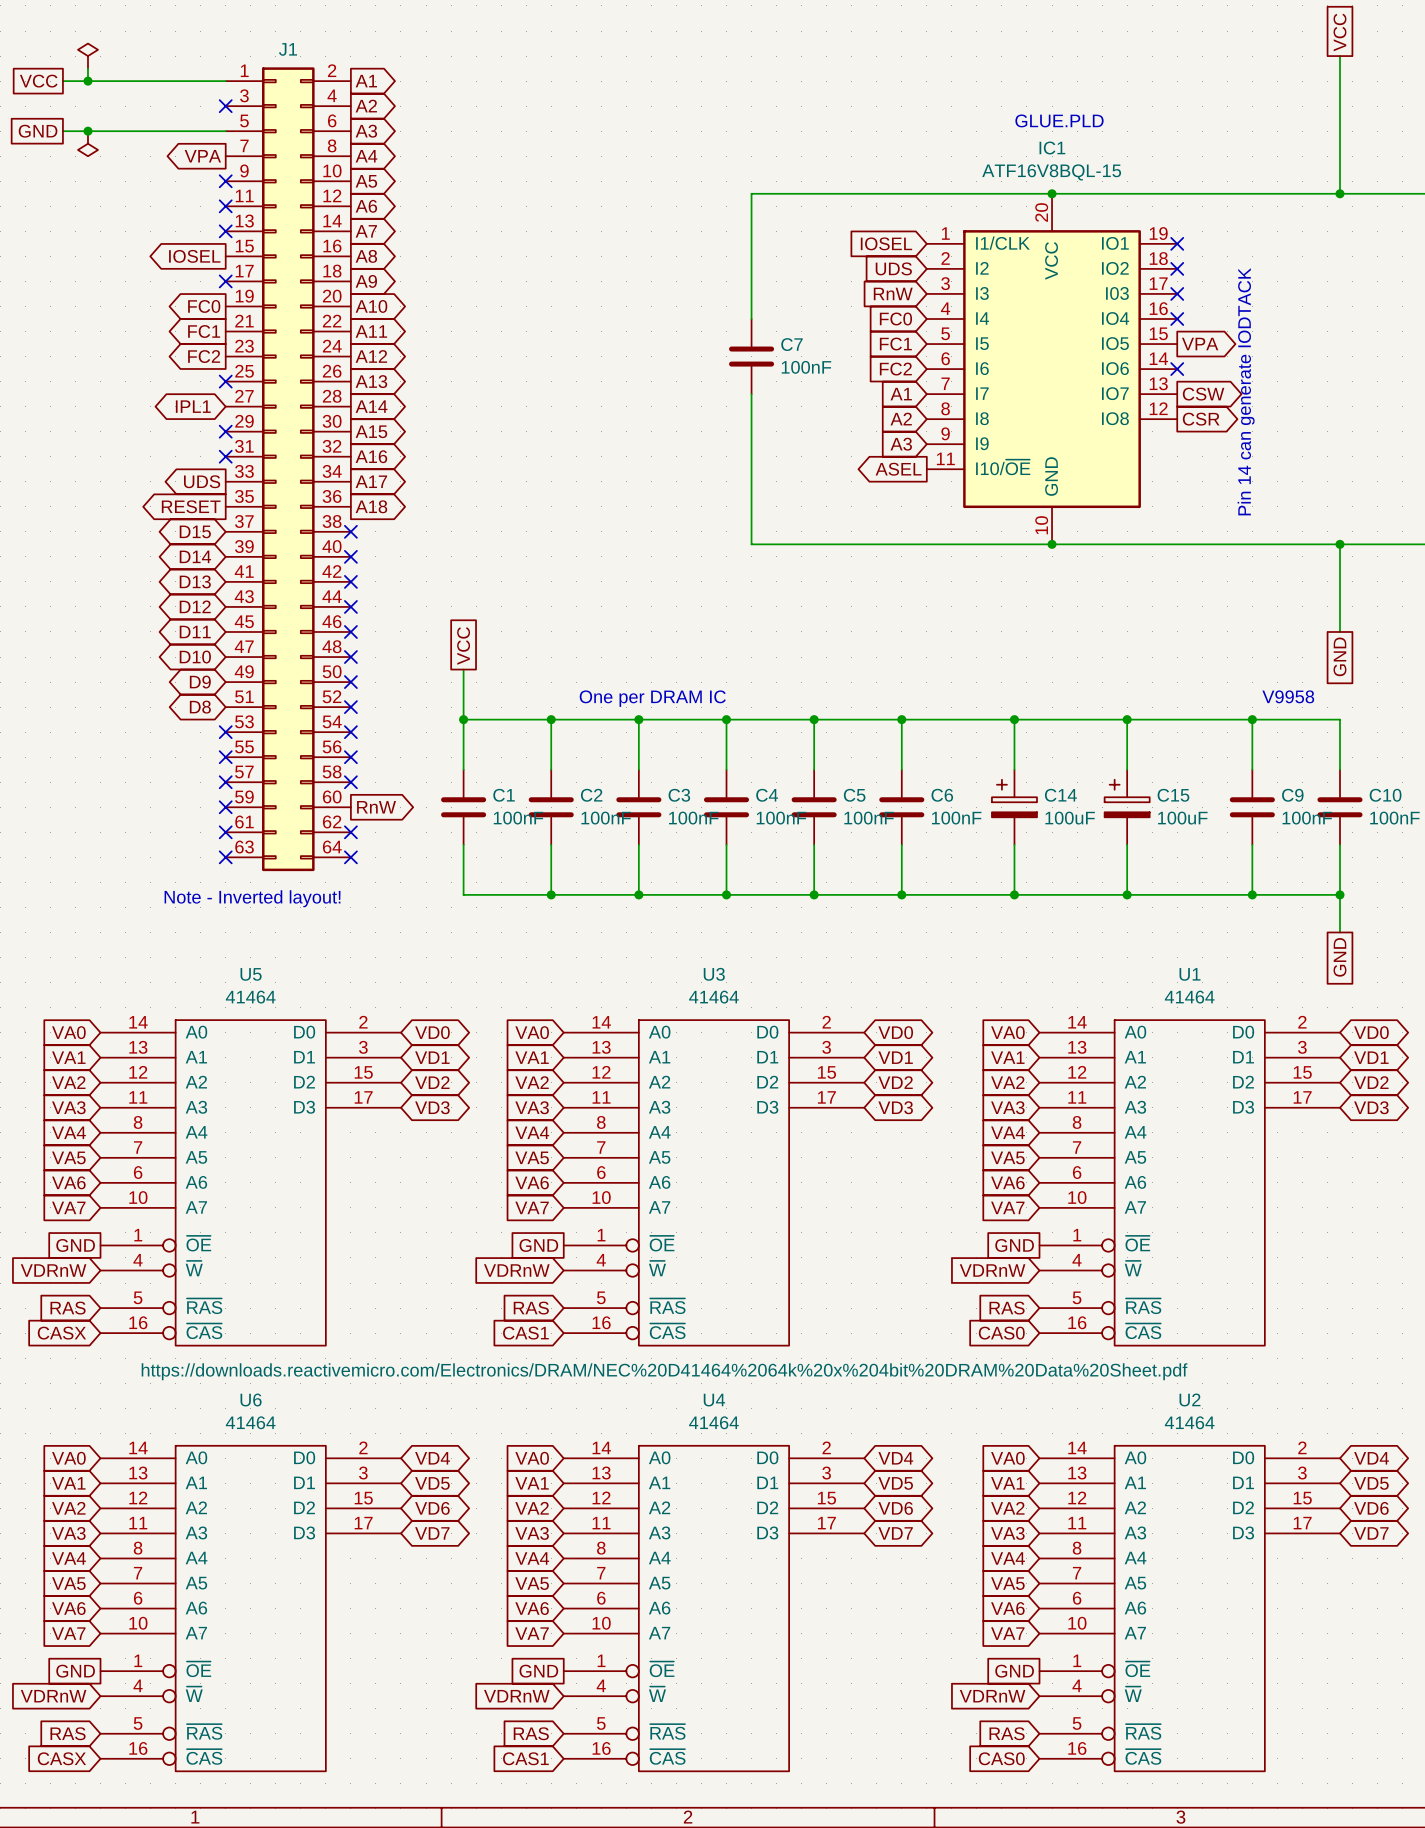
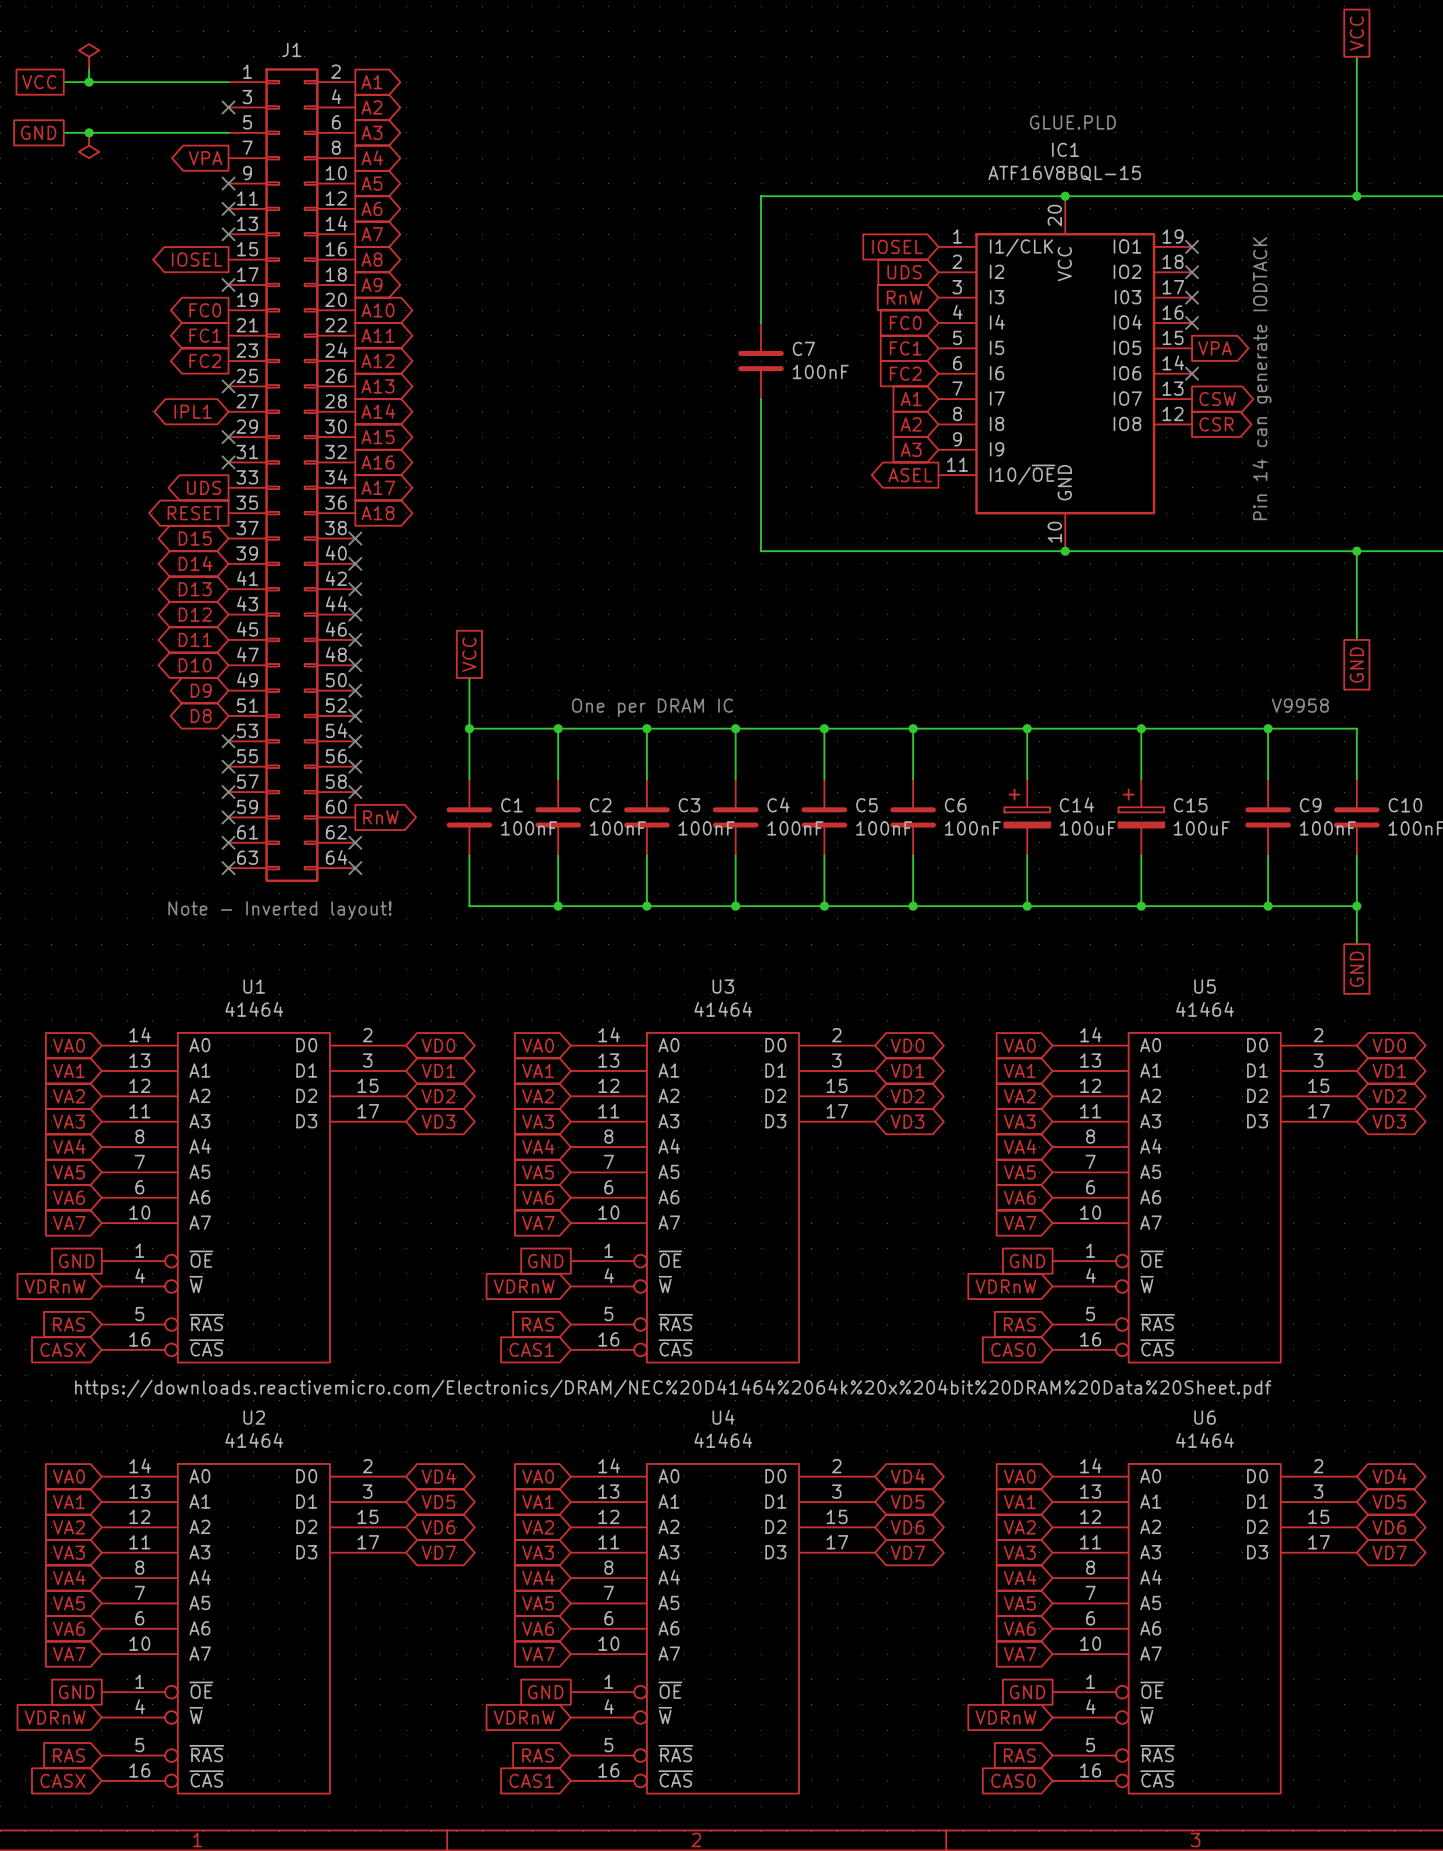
U5 name: U5 (251, 974) -> U1 (254, 986)
U1 name: U1 (1190, 974) -> U5 (1205, 986)
U6 name: U6 (251, 1399) -> U2 (254, 1417)
U2 name: U2 (1189, 1399) -> U6 (1205, 1417)

